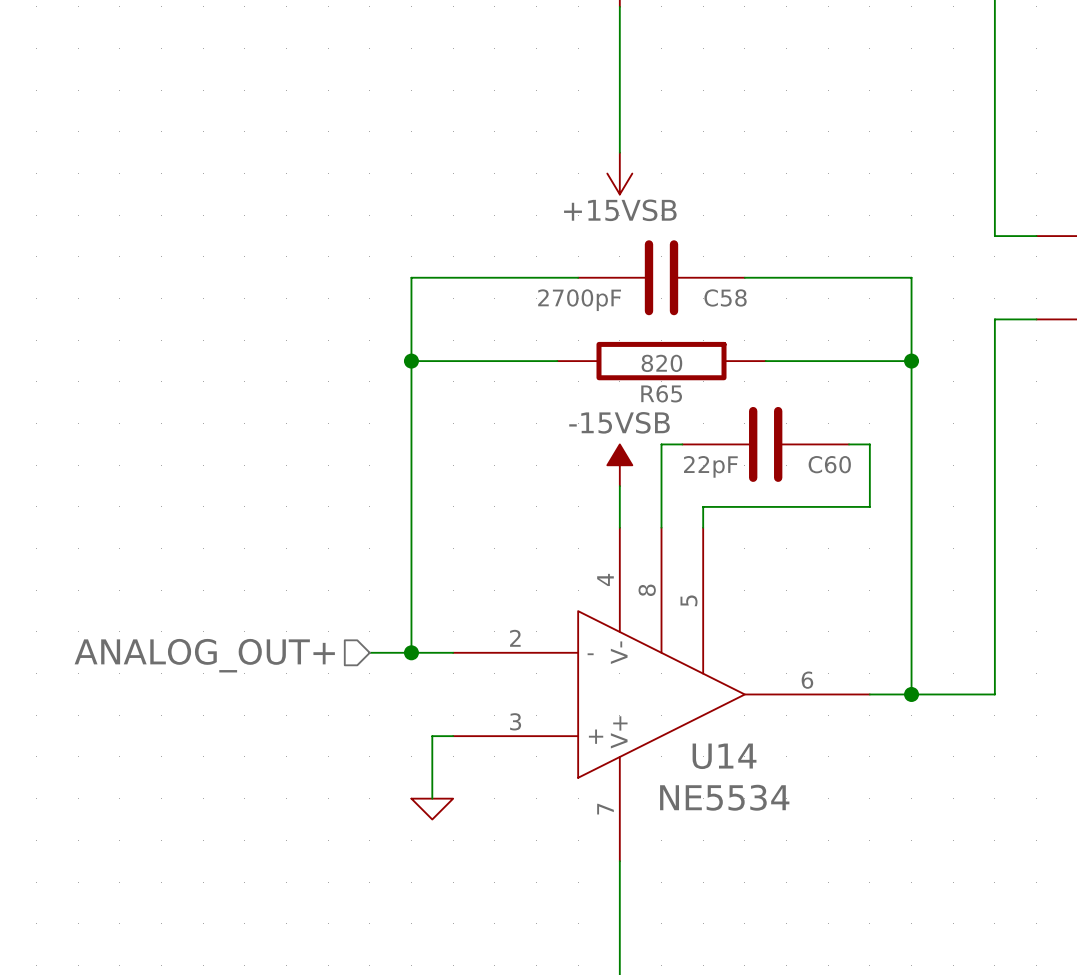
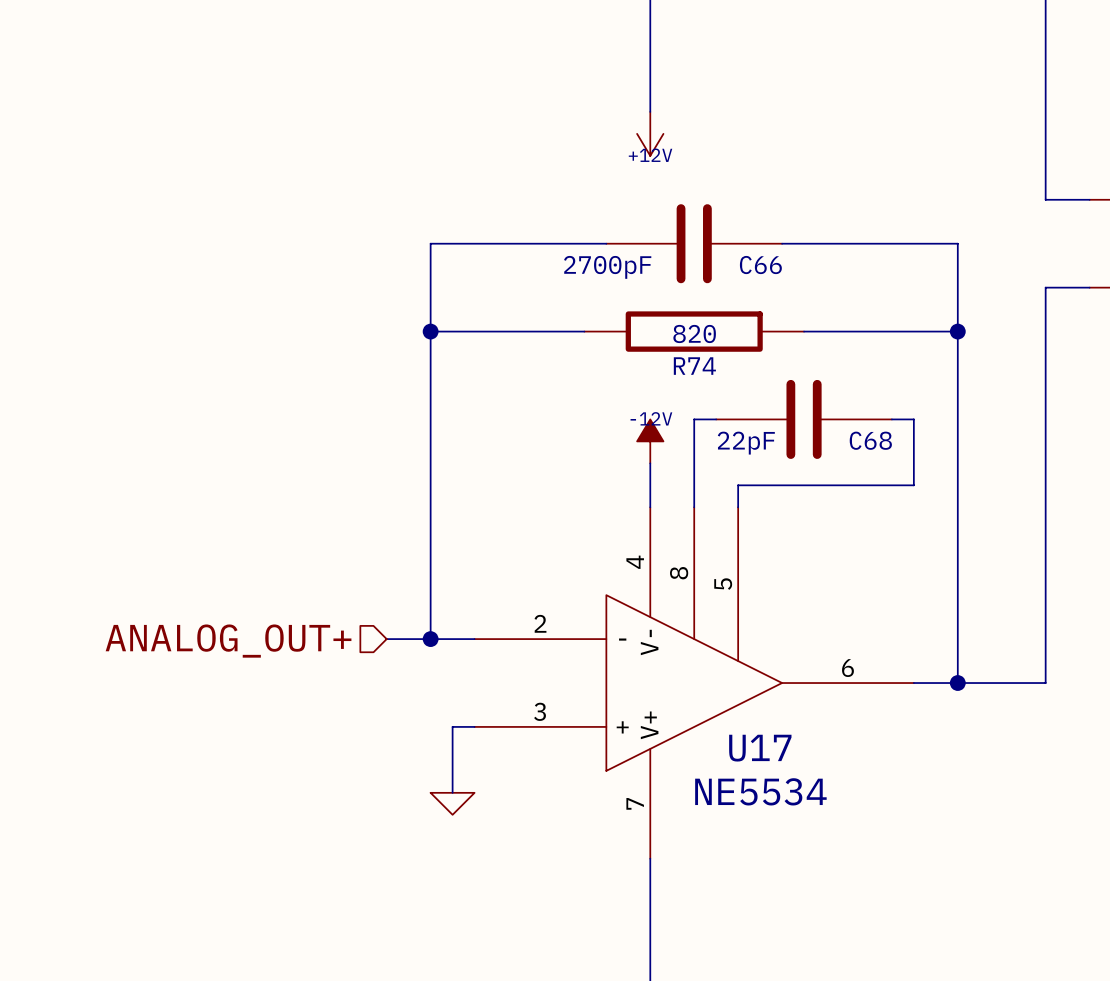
power symbol: +15VSB (619, 173) -> +12V (650, 133)
C58 name: C58 (725, 297) -> C66 (760, 265)
R65 name: R65 (661, 393) -> R74 (694, 366)
C60 name: C60 (829, 464) -> C68 (870, 440)
power symbol: -15VSB (619, 465) -> -12V (650, 441)
U14 name: U14 (724, 756) -> U17 (760, 748)

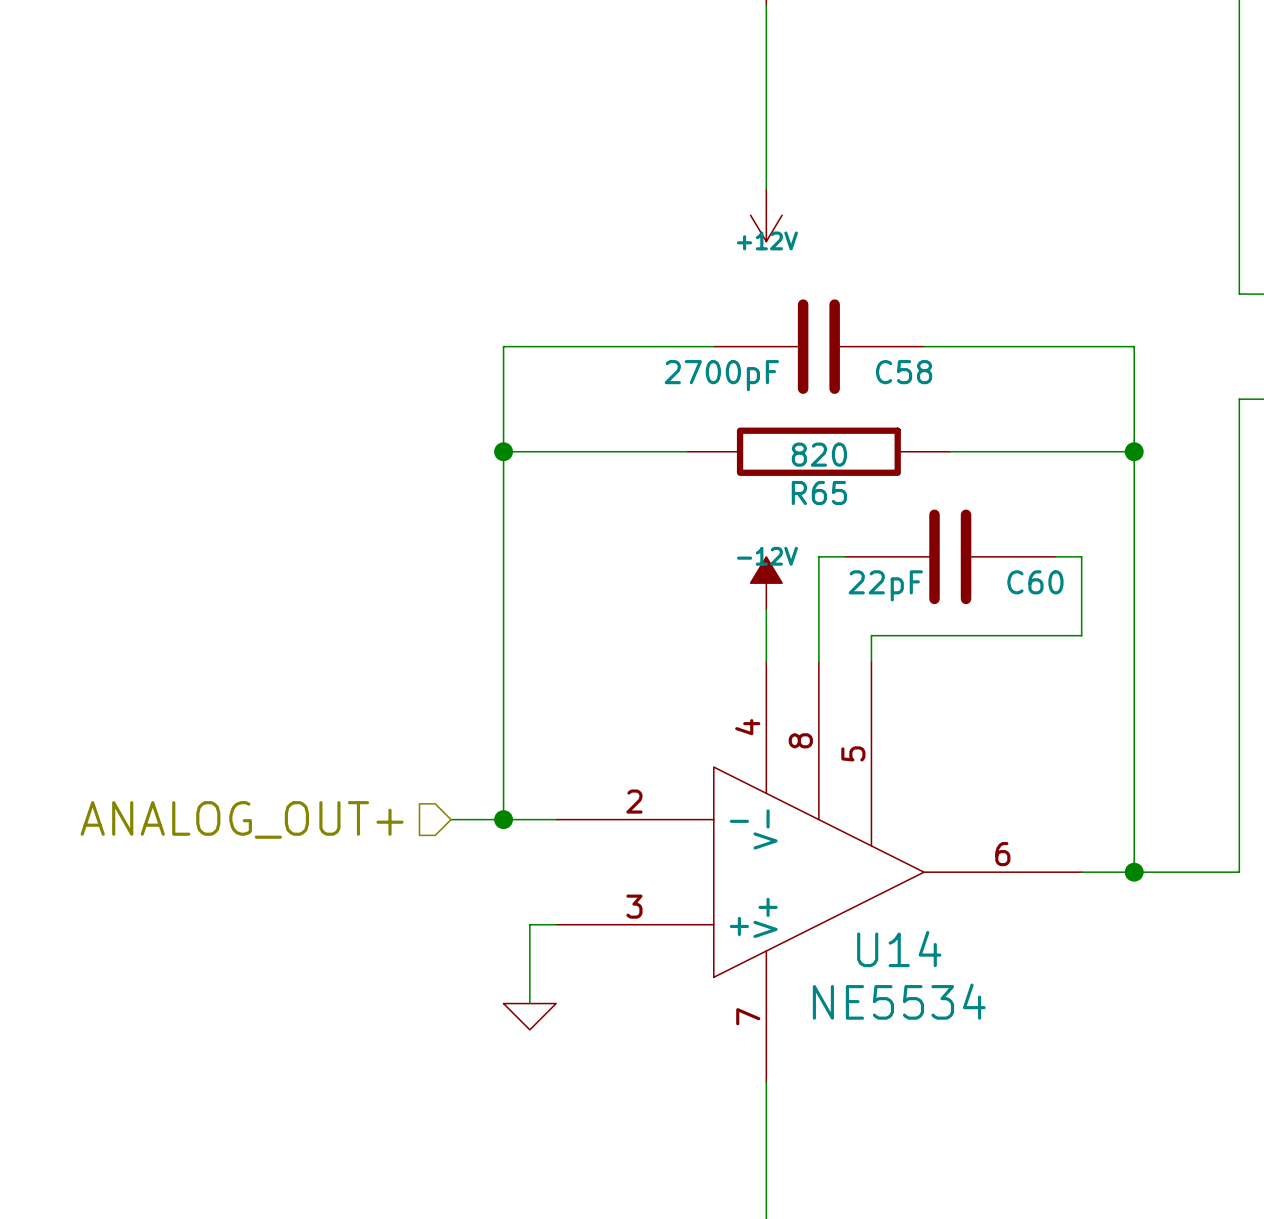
C66 name: C66 (760, 265) -> C58 (904, 372)
R74 name: R74 (694, 366) -> R65 (819, 493)
C68 name: C68 (870, 440) -> C60 (1035, 582)
U17 name: U17 (760, 748) -> U14 (899, 949)

